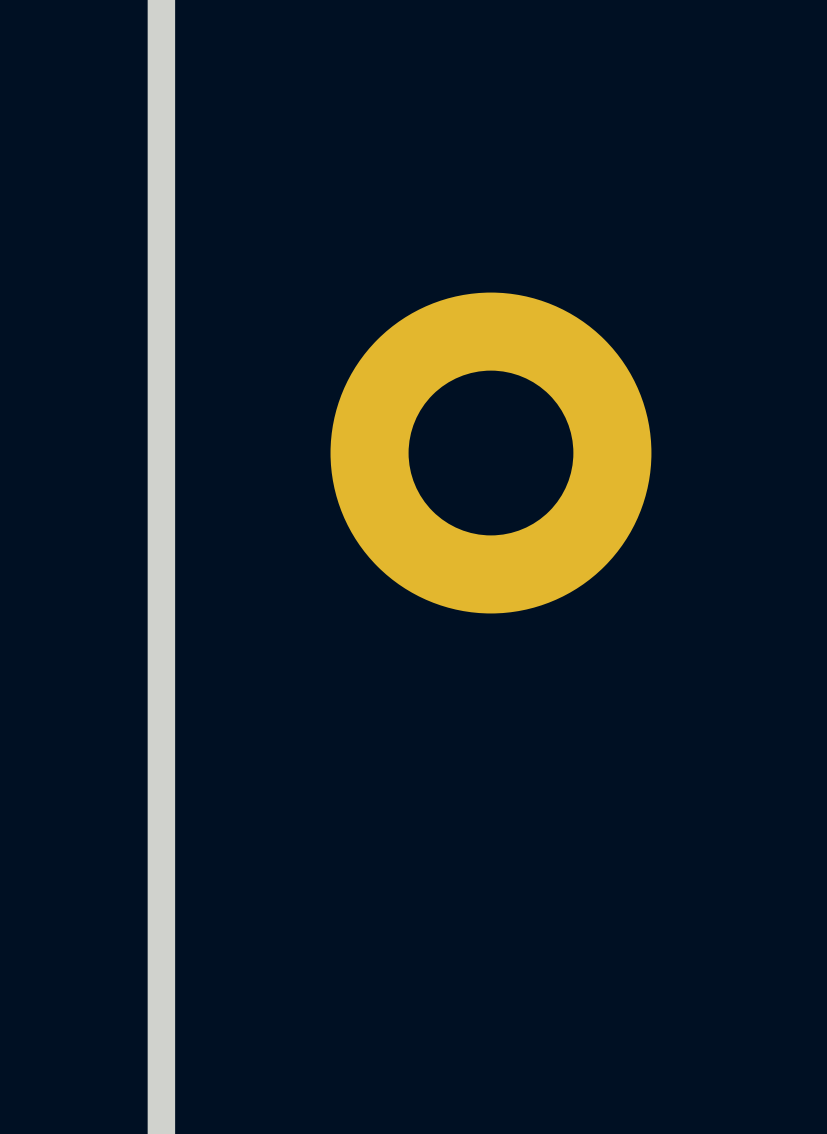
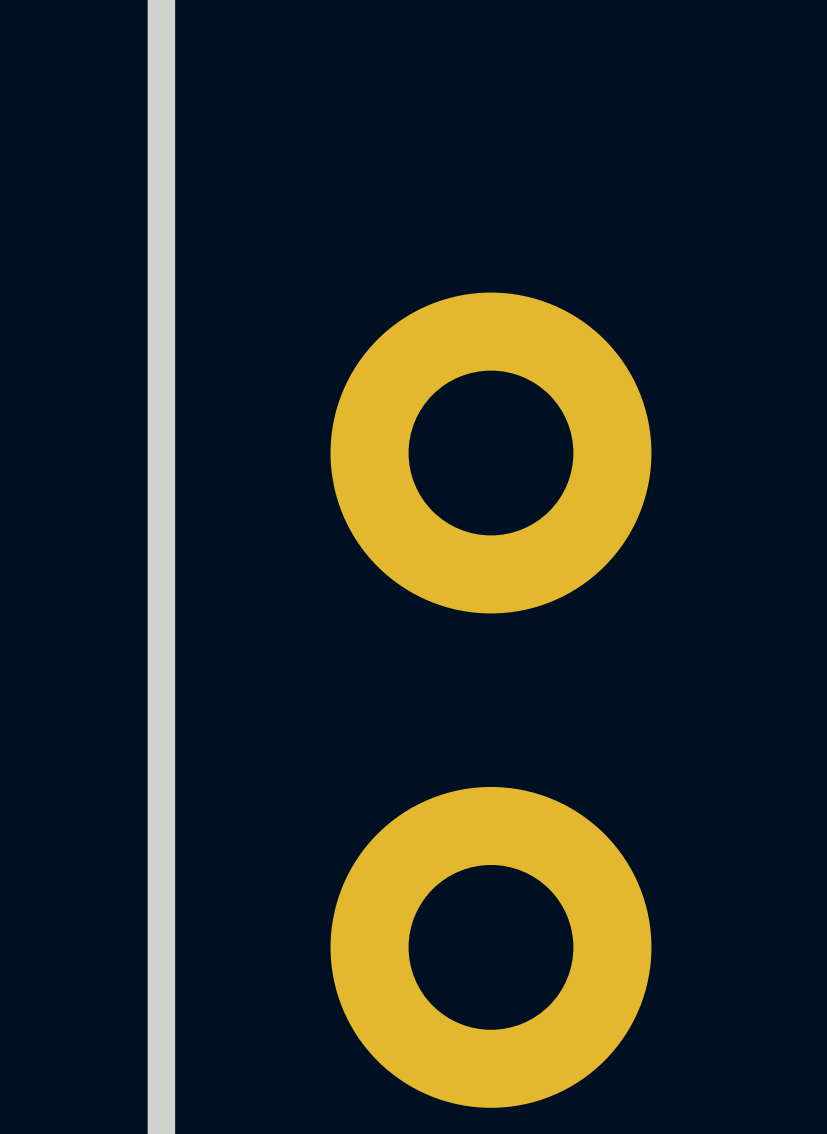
part: none -> (490, 947)

